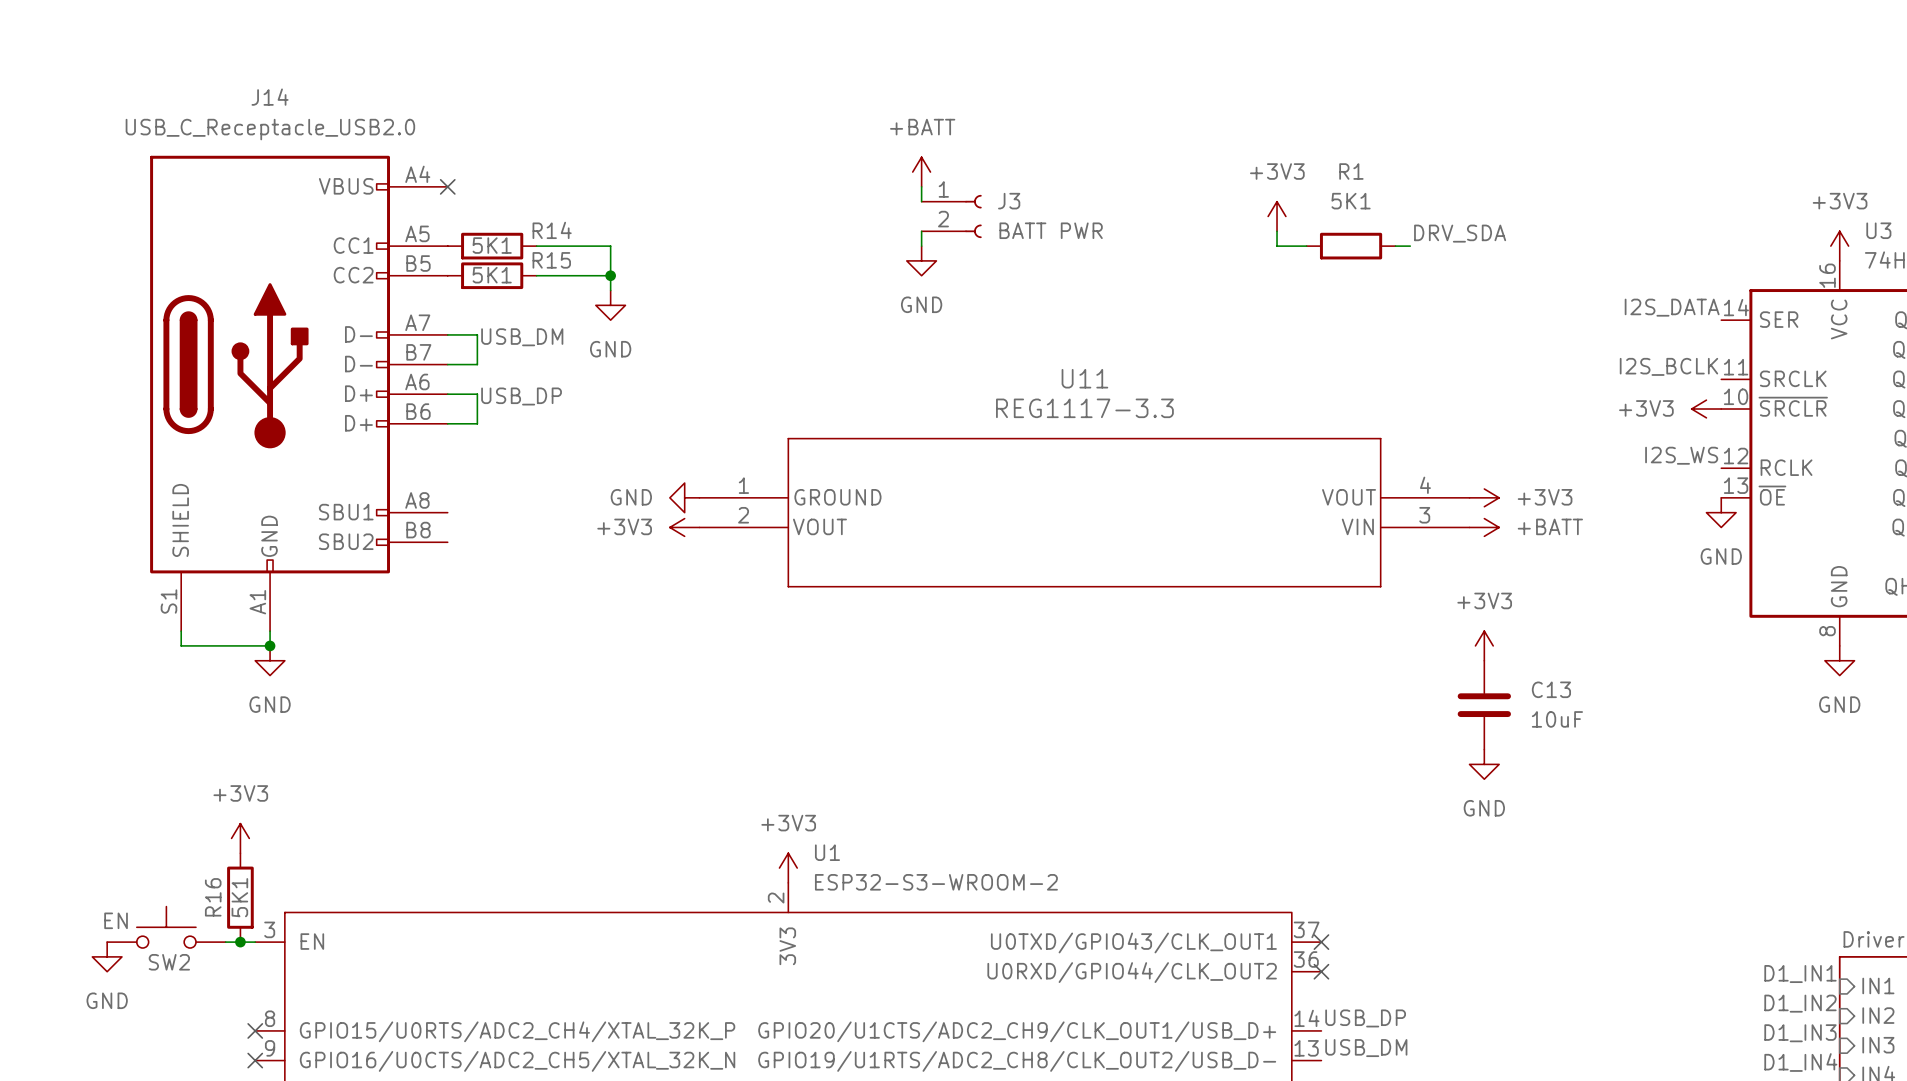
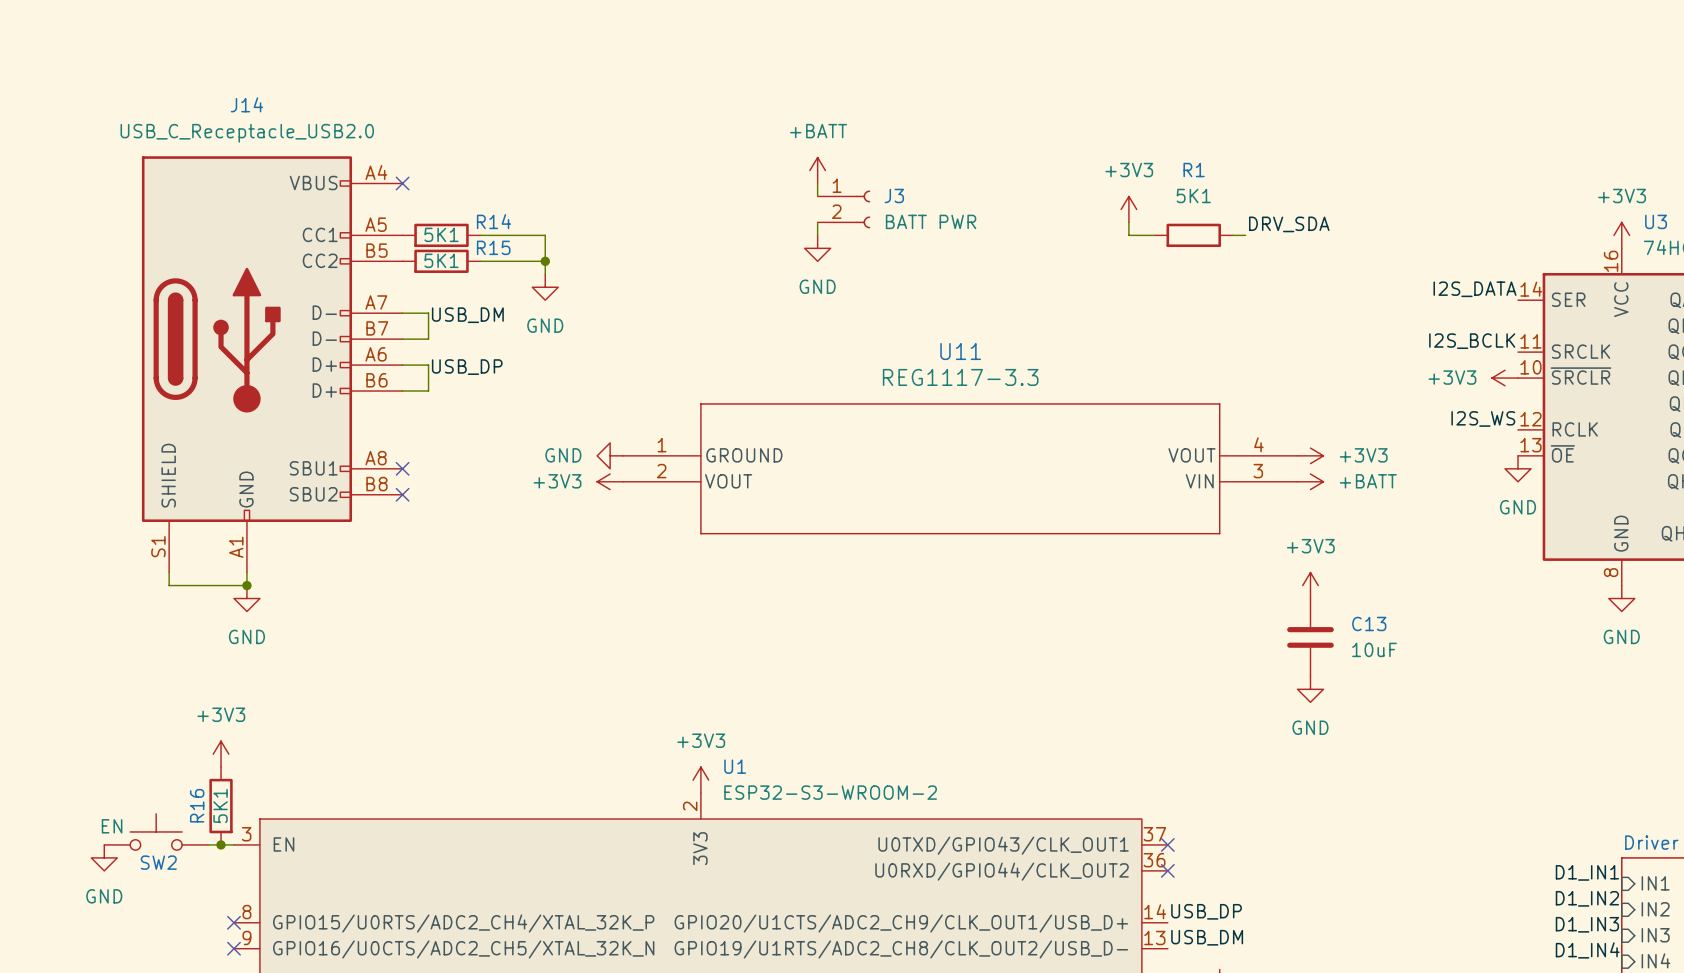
no-connect mark: none -> (402, 468)
no-connect mark: none -> (402, 494)

